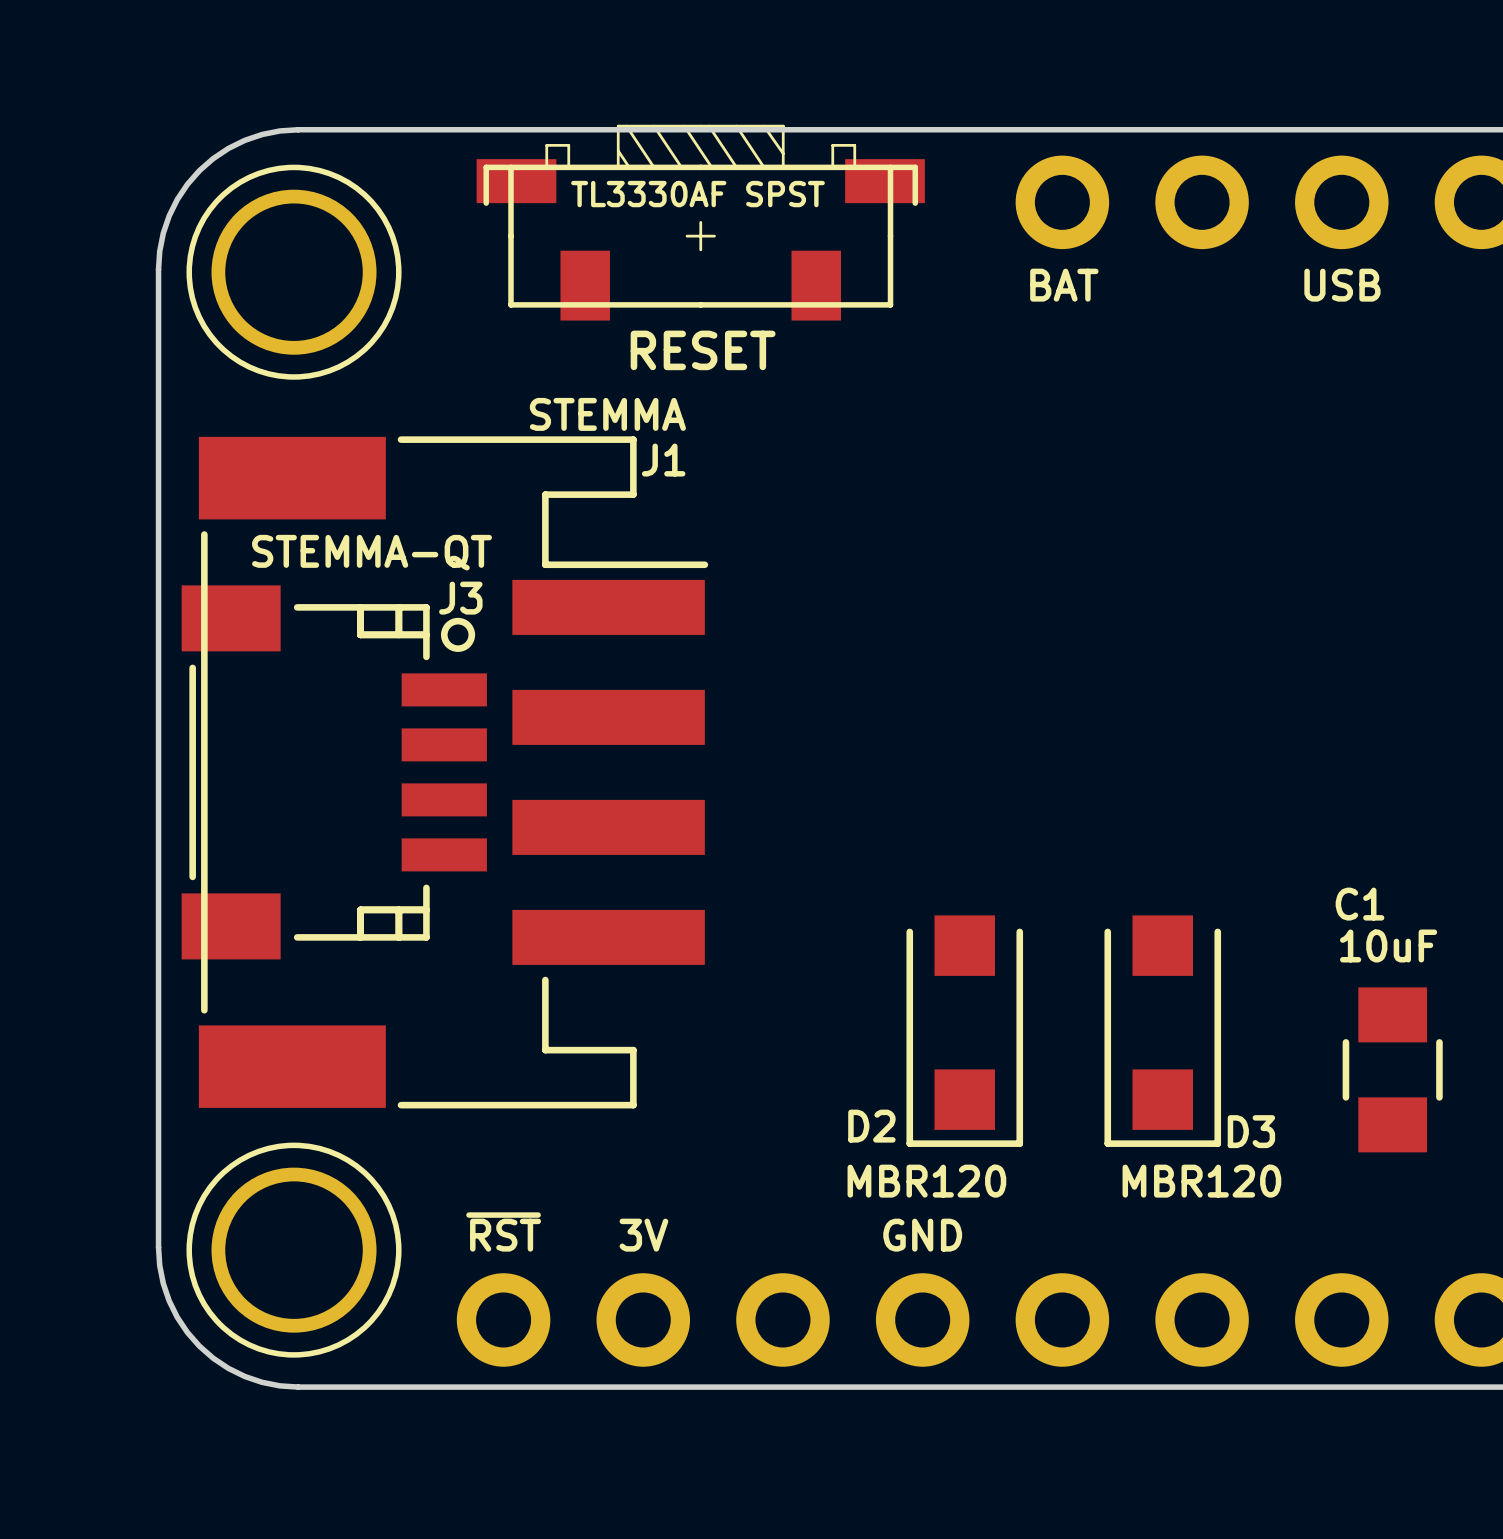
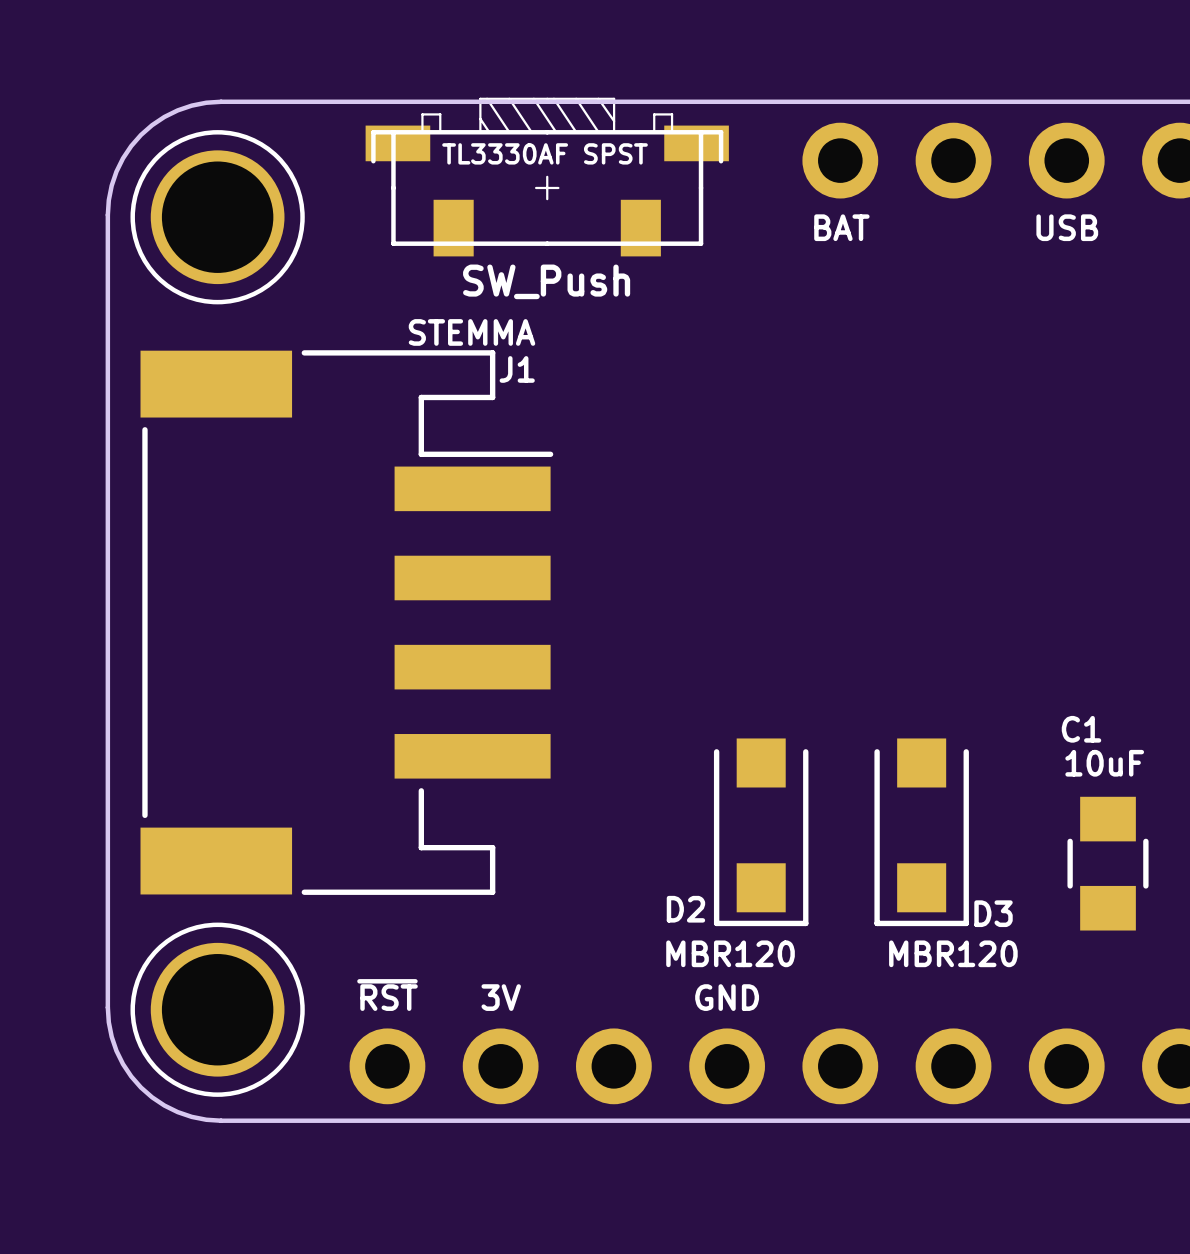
part value: RESET (703, 350) -> SW_Push (546, 281)
J3: STEMMA-QT (334, 772) -> none

